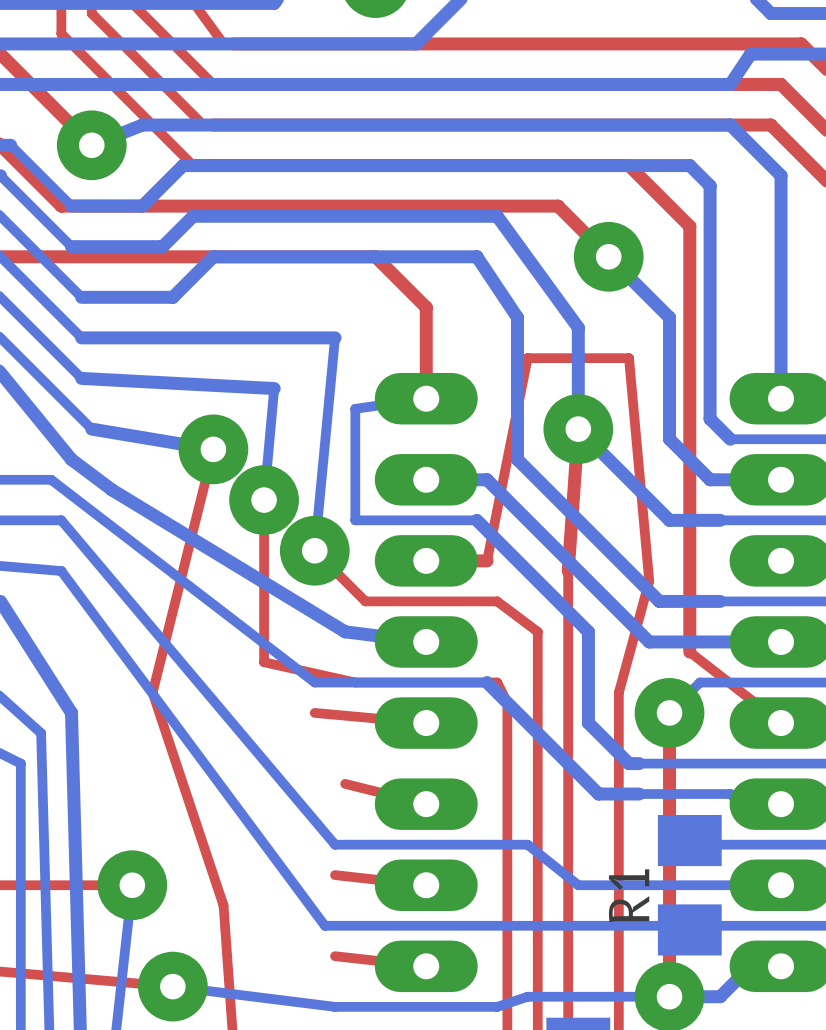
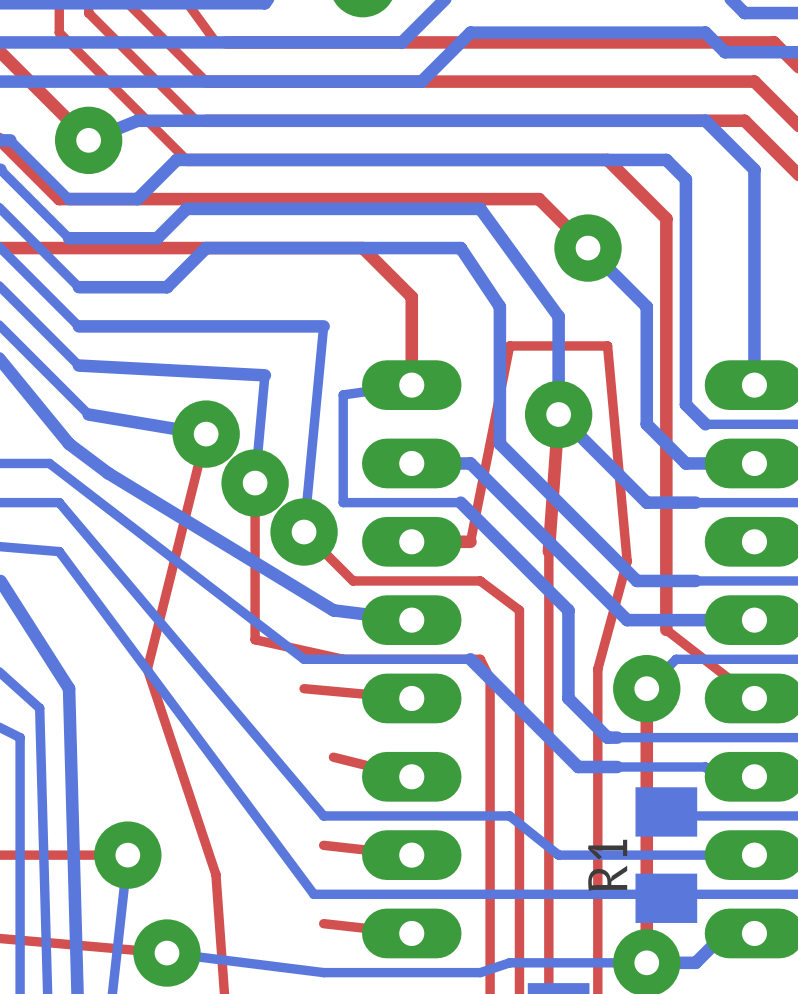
bottom track: (750, 54) (730, 84) (436, 84) -> (725, 52) (705, 32) (470, 32) (421, 81)

